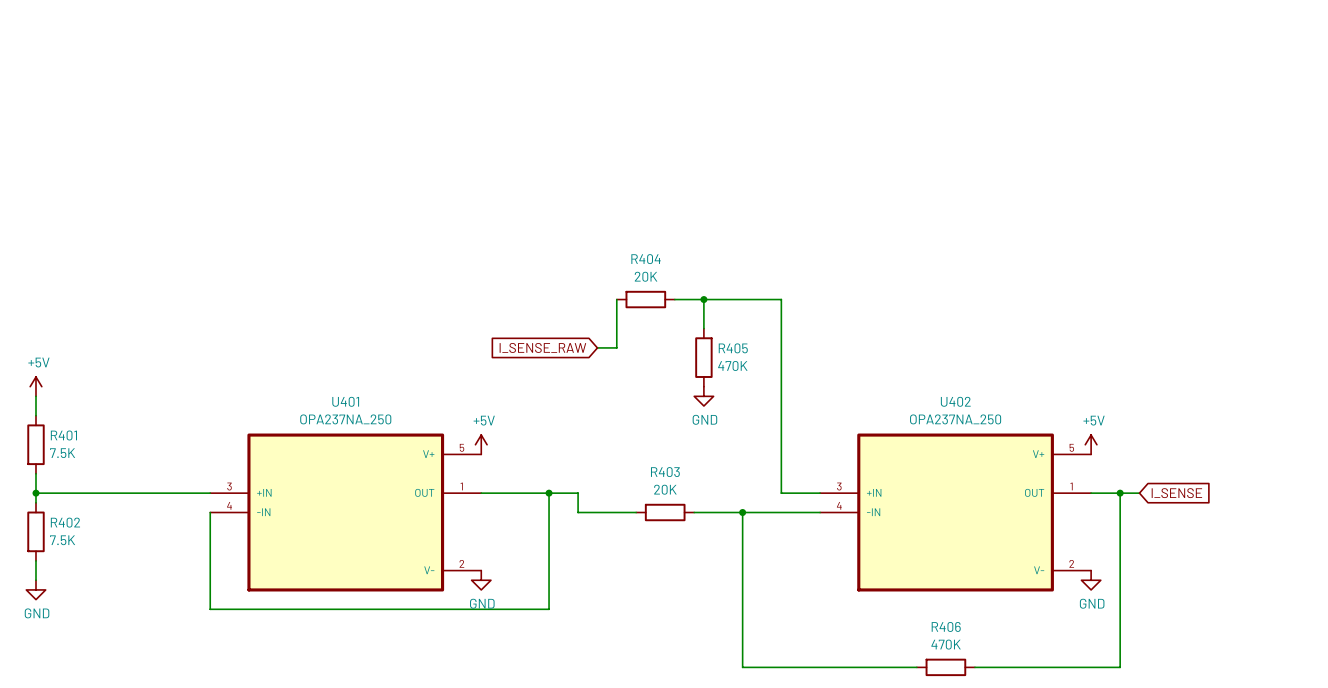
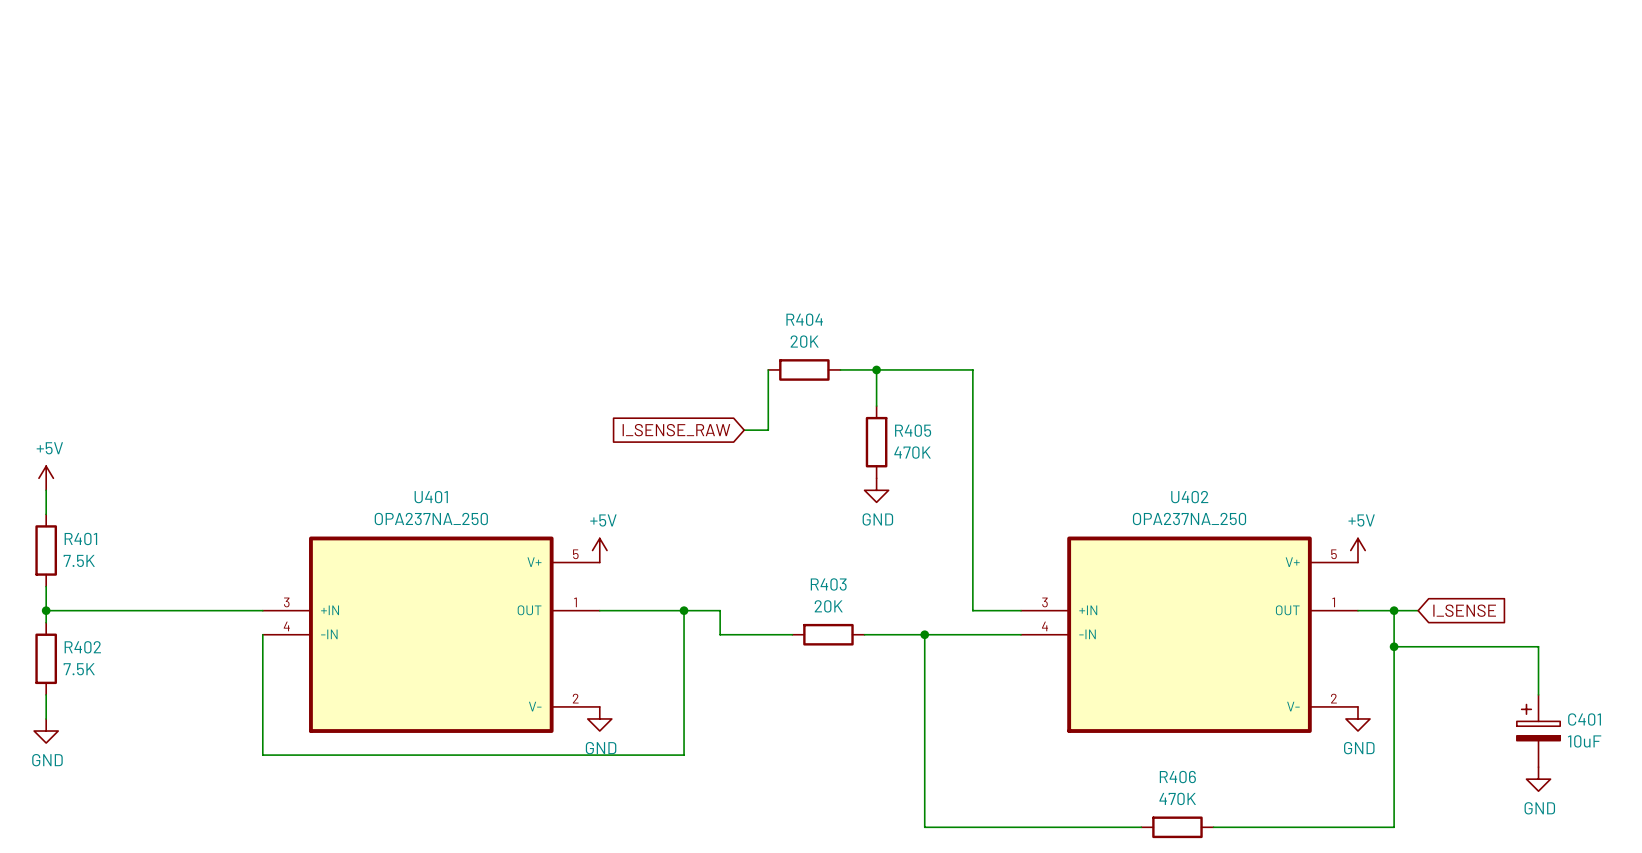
wire: none -> (1394, 646) (1538, 646) (1538, 694)
junction: none -> (1394, 646)
C401: none -> 10uF (1538, 731)
power symbol: none -> GND (1538, 779)

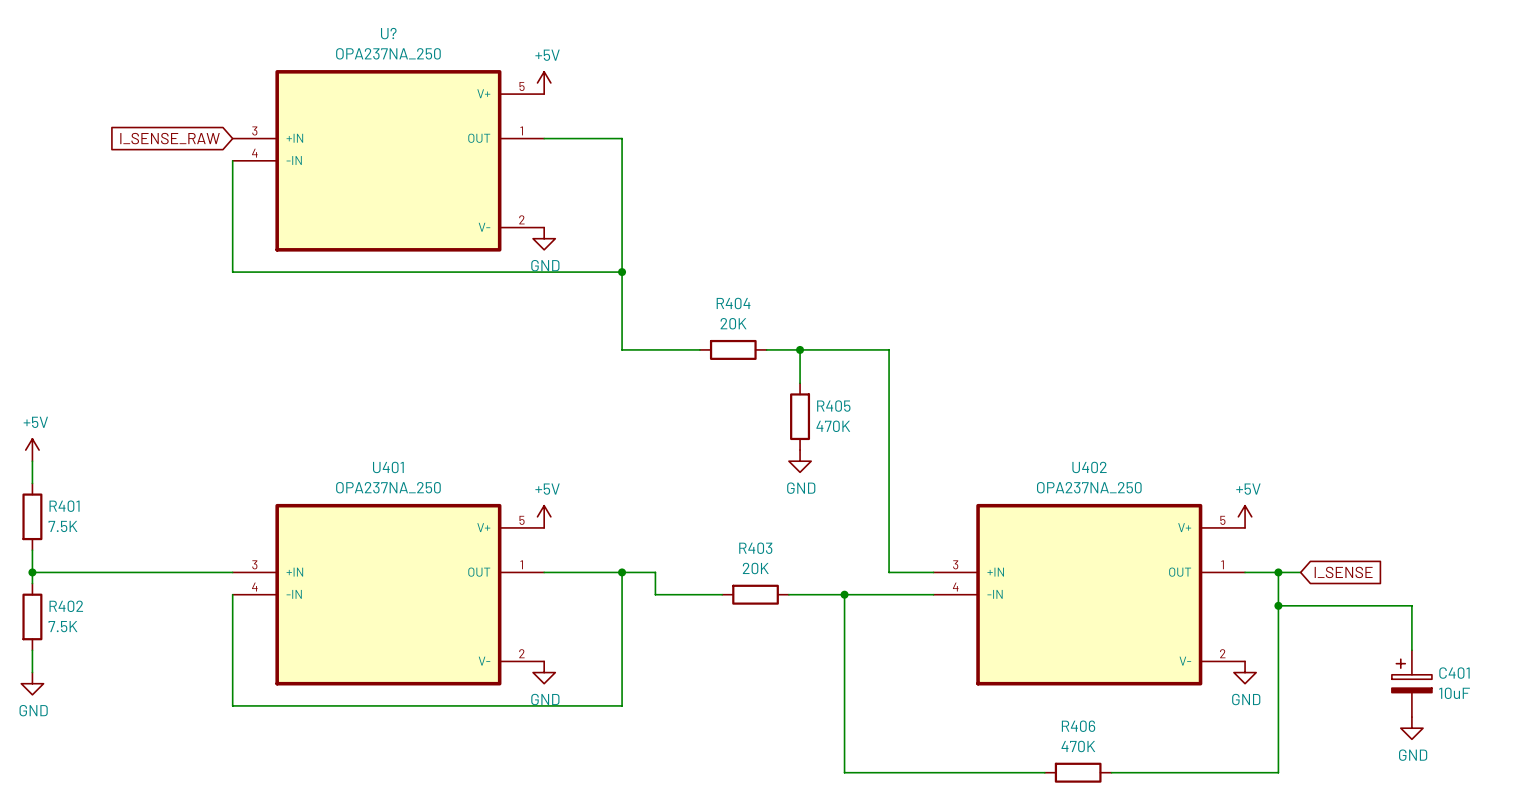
power symbol: none -> +5V (544, 82)
global label: none -> I_SENSE_RAW (170, 138)
wire: none -> (232, 160) (232, 272) (622, 272)
U?: none -> OPA237NA_250 (388, 160)
power symbol: none -> GND (544, 238)
junction: none -> (622, 272)
wire: (768, 369) (768, 430) (744, 430) -> (699, 349) (622, 349) (622, 138) (544, 138)
global label: I_SENSE_RAW (676, 430) -> none

